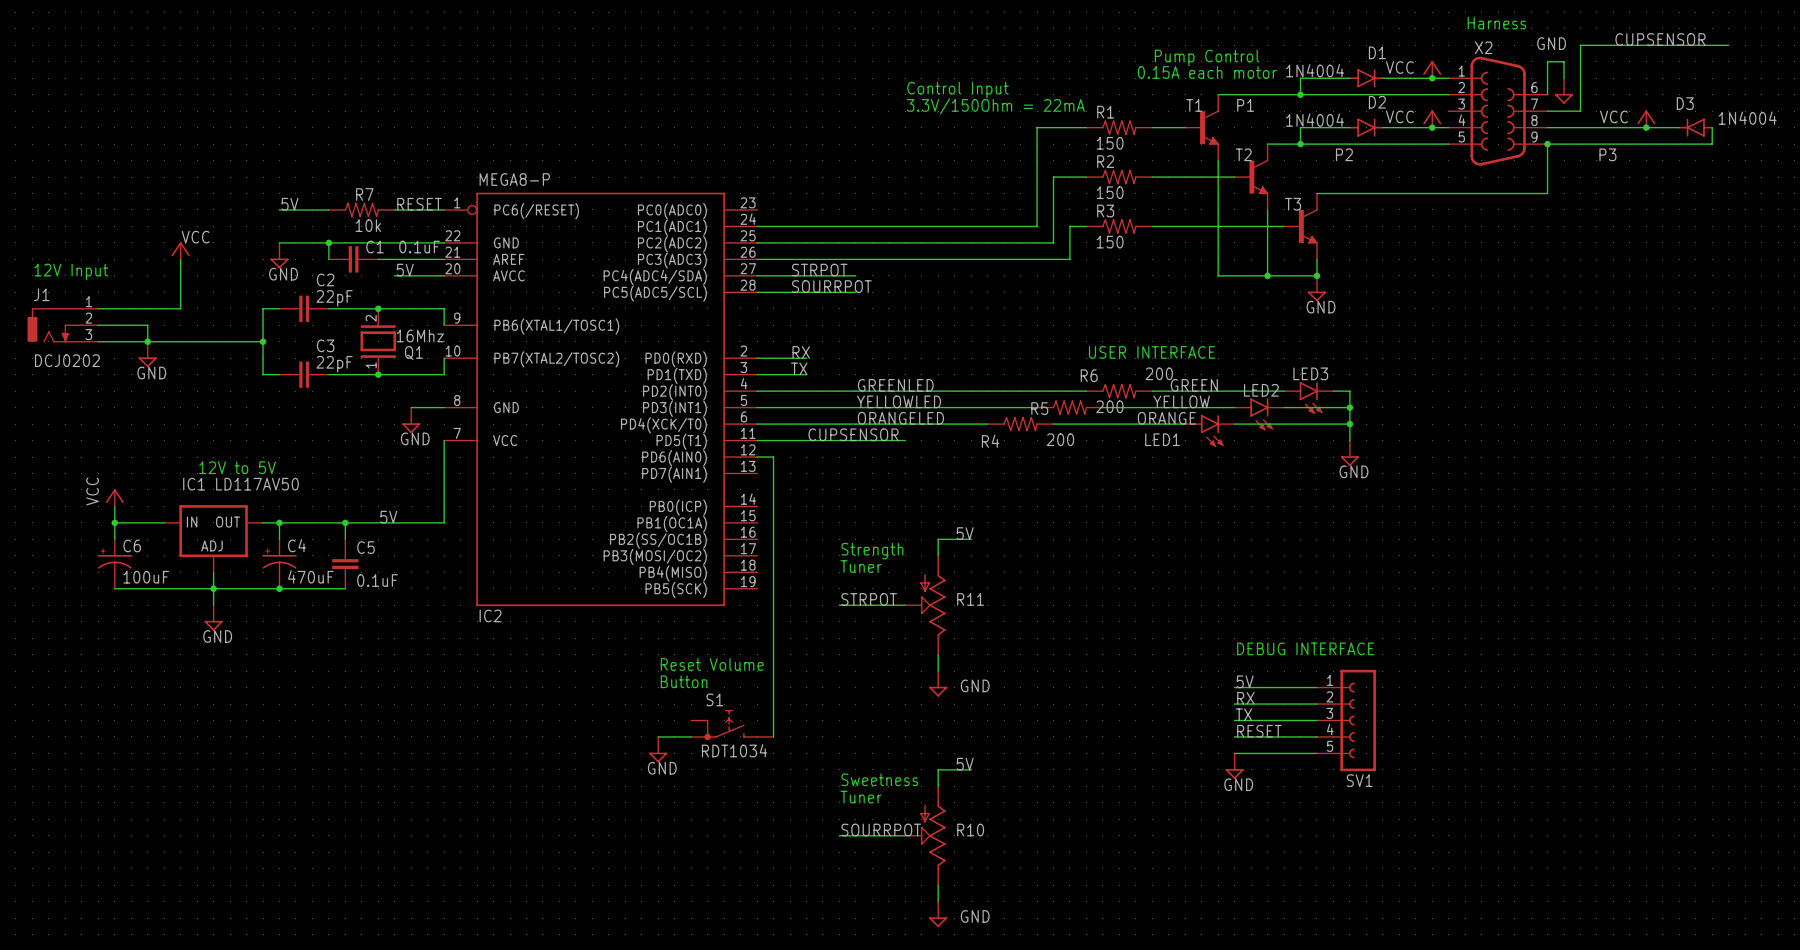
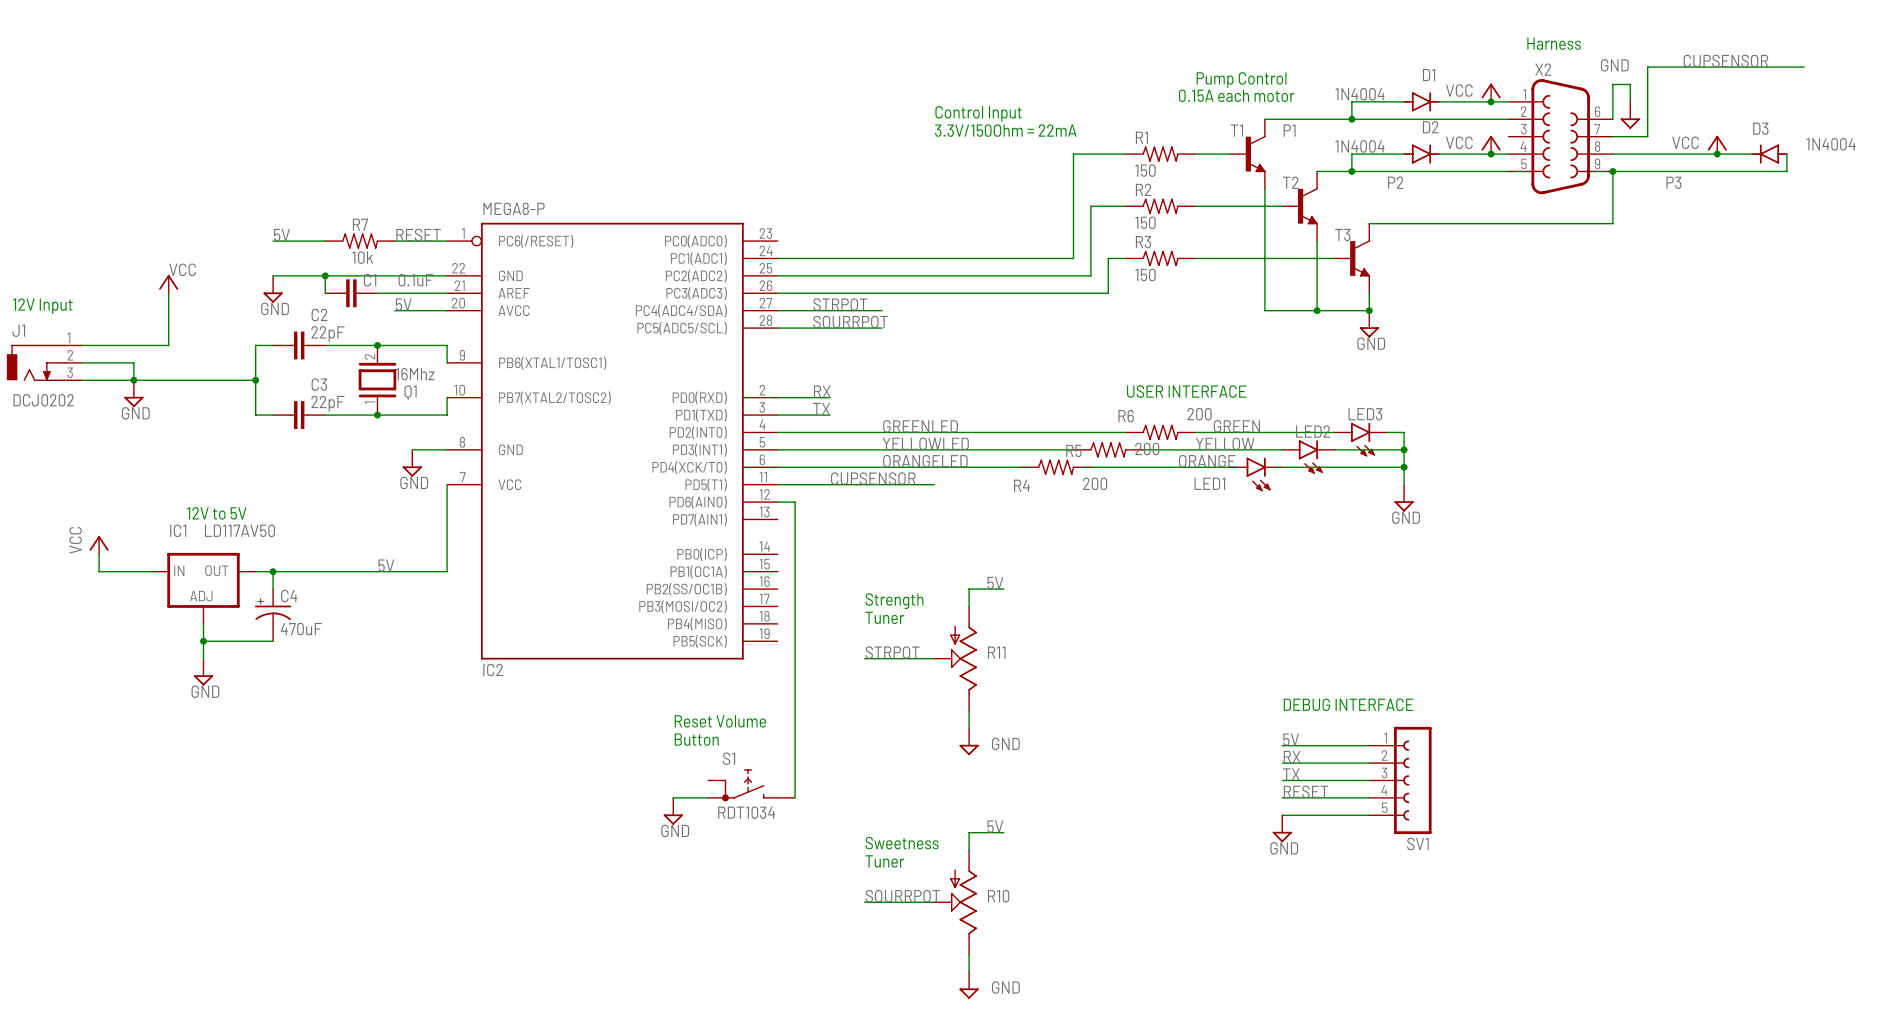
wire: (114, 522) (114, 539) -> none
junction: (114, 522) -> none
wire: (345, 522) (345, 539) -> none
junction: (345, 522) -> none
C6: 100uF (114, 564) -> none
C5: 0.1uF (345, 564) -> none
wire: (114, 588) (213, 588) -> none
wire: (279, 588) (345, 588) -> none
junction: (279, 588) -> none

